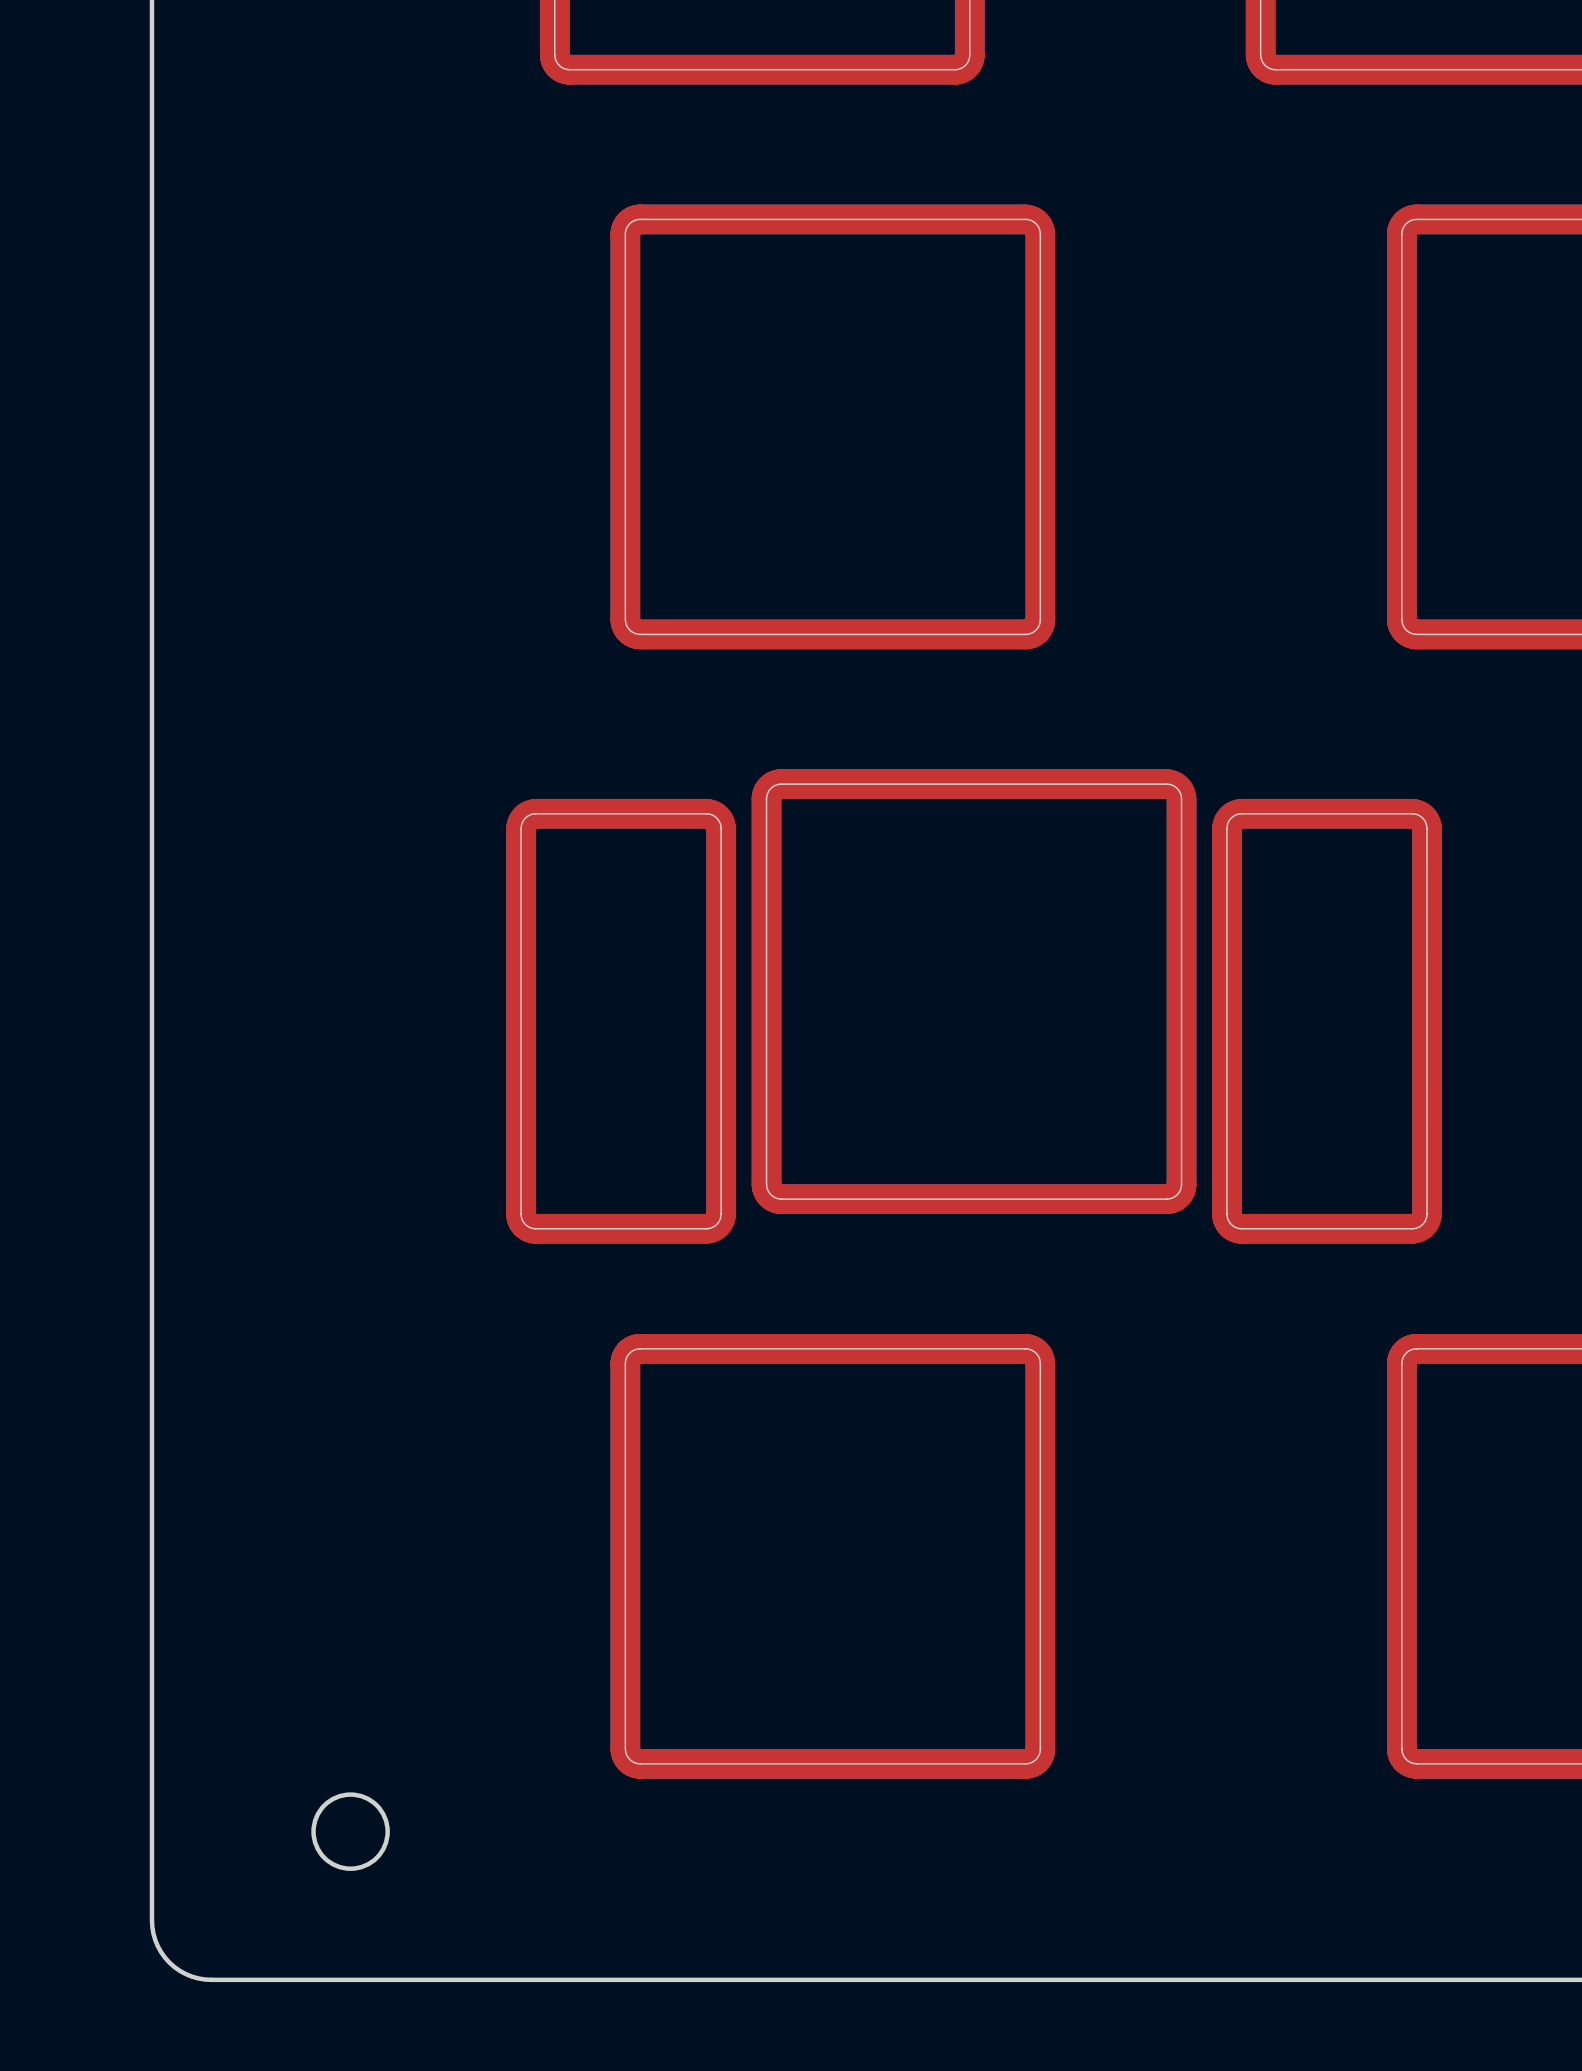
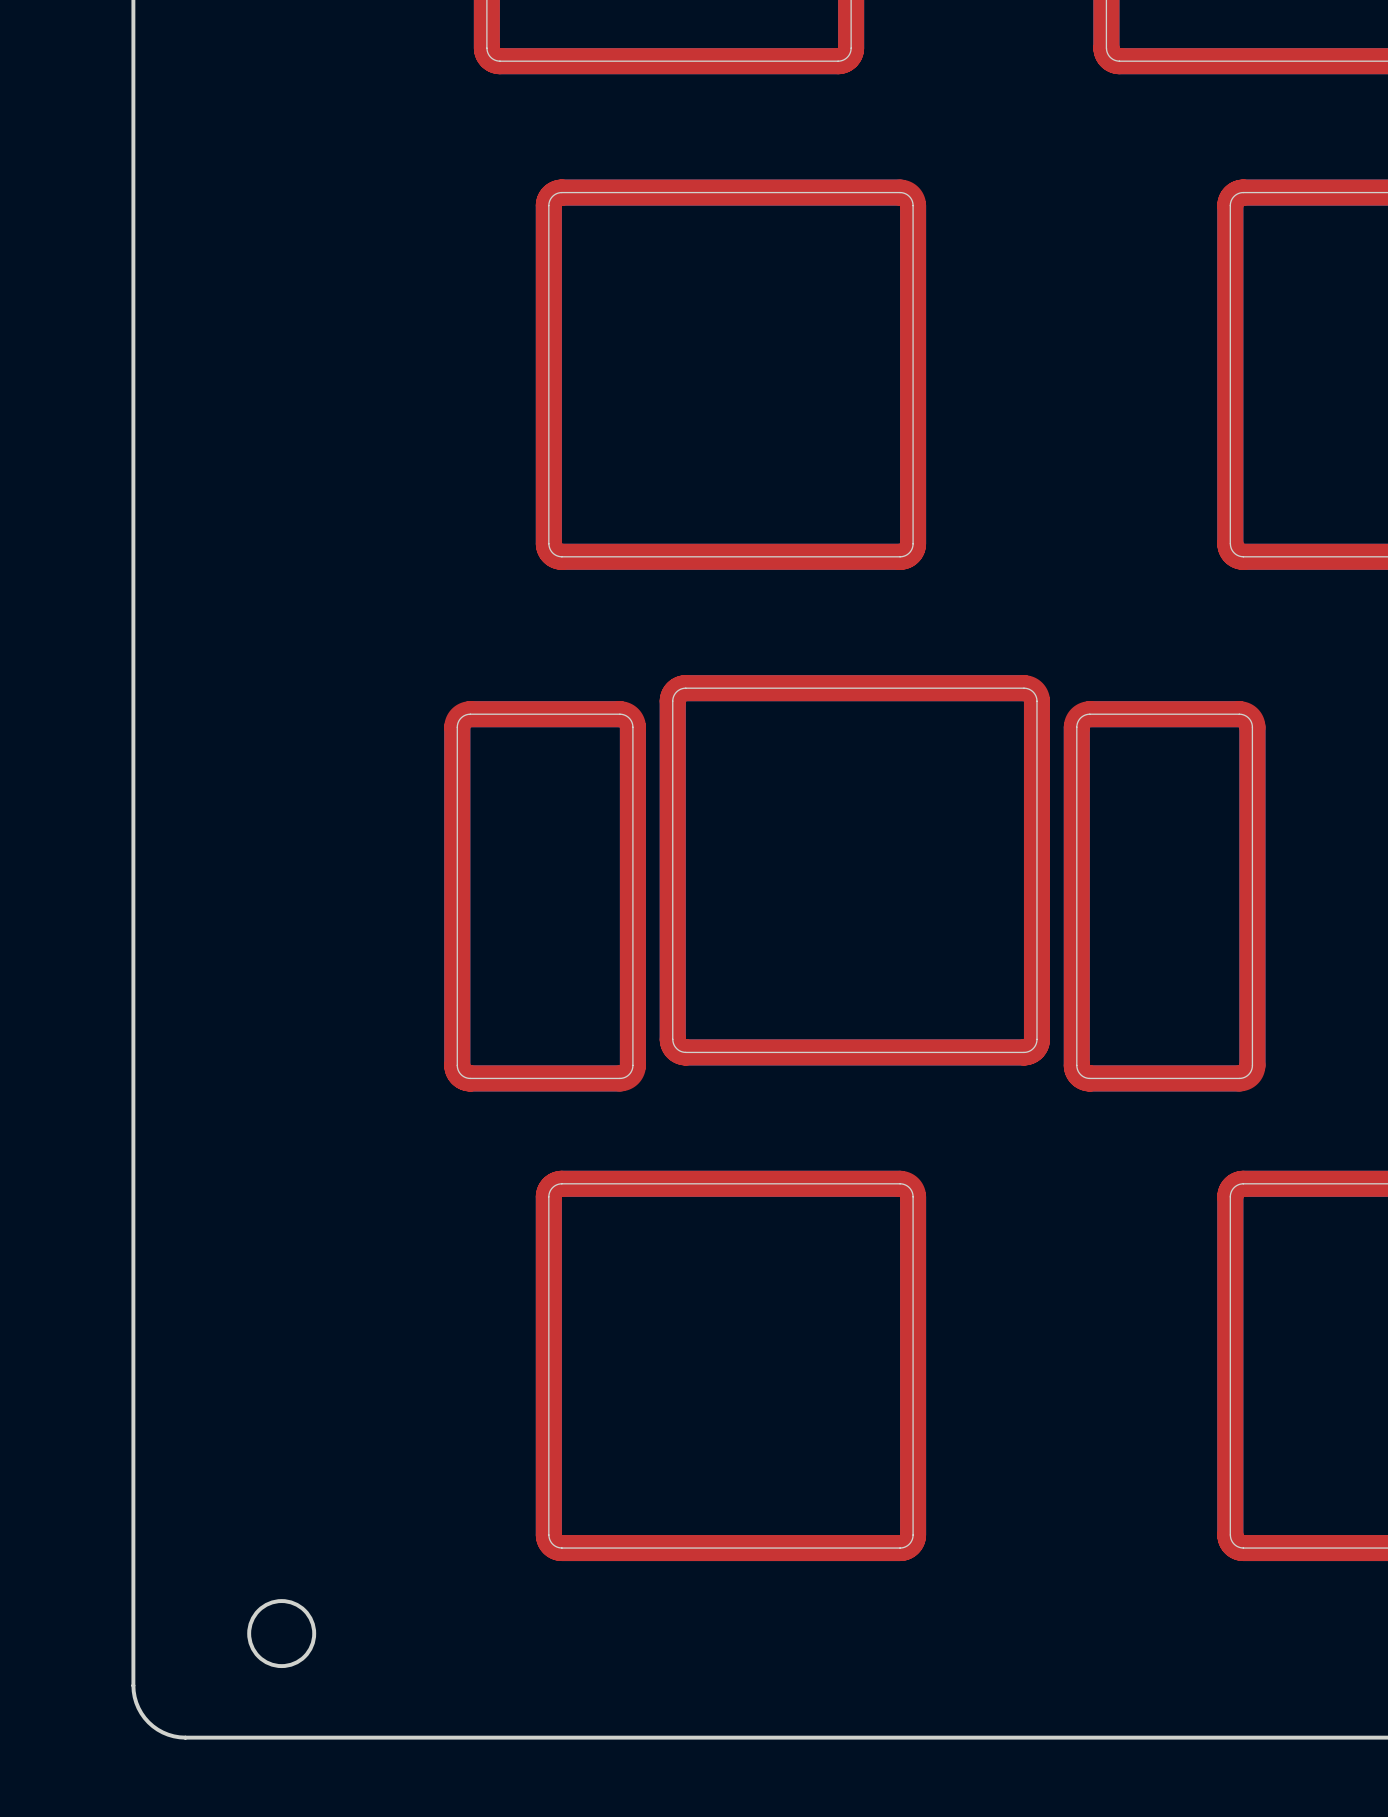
round board edge position: (350, 1831) -> (281, 1633)

